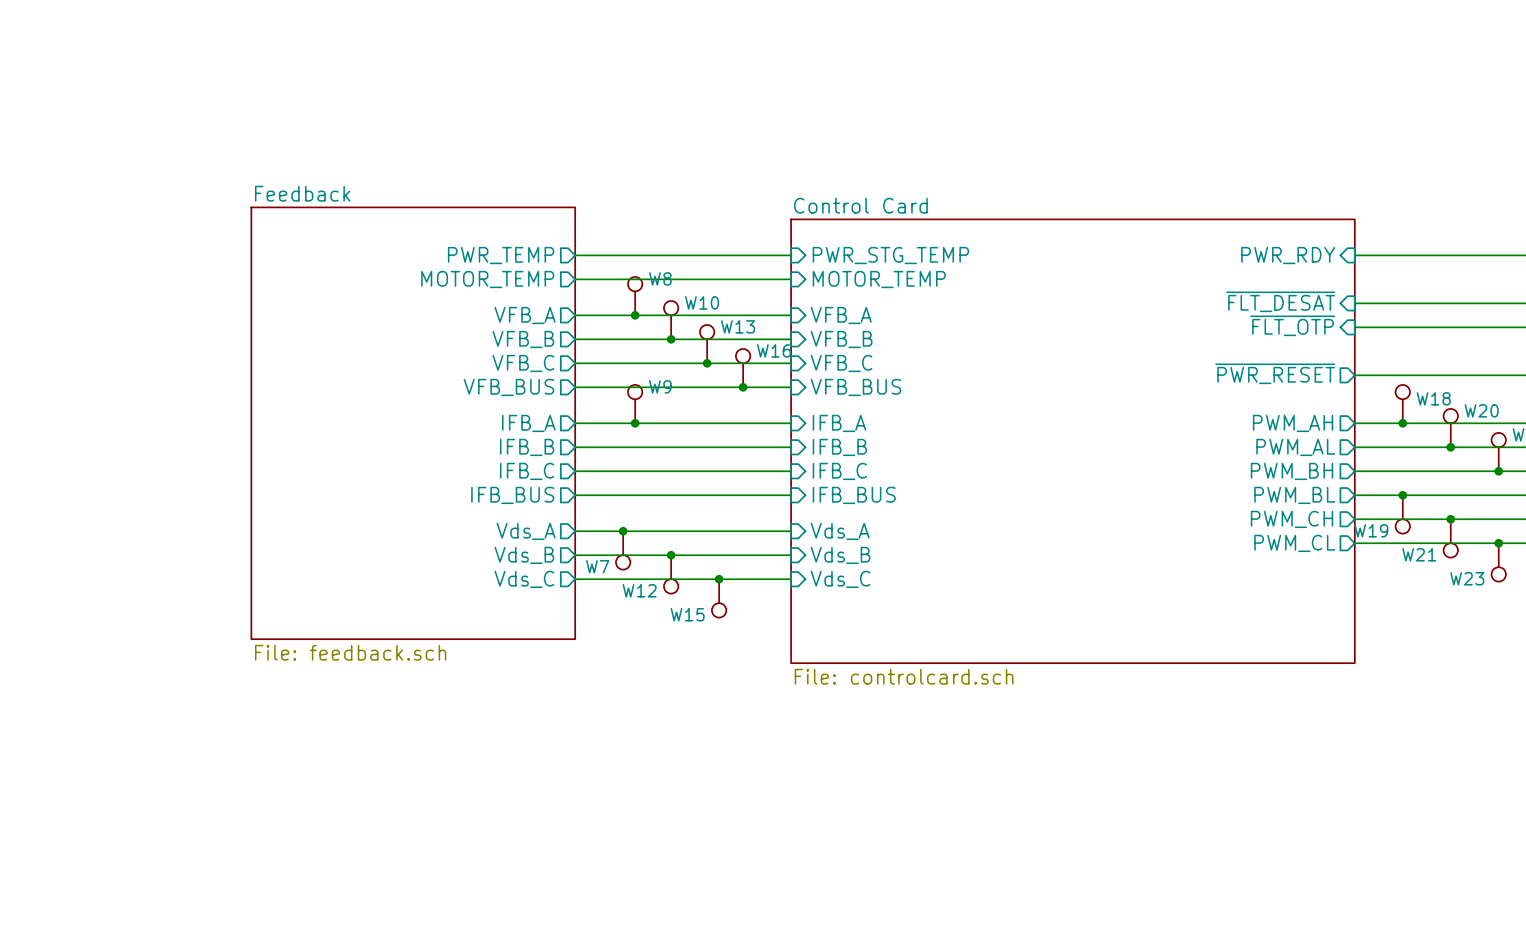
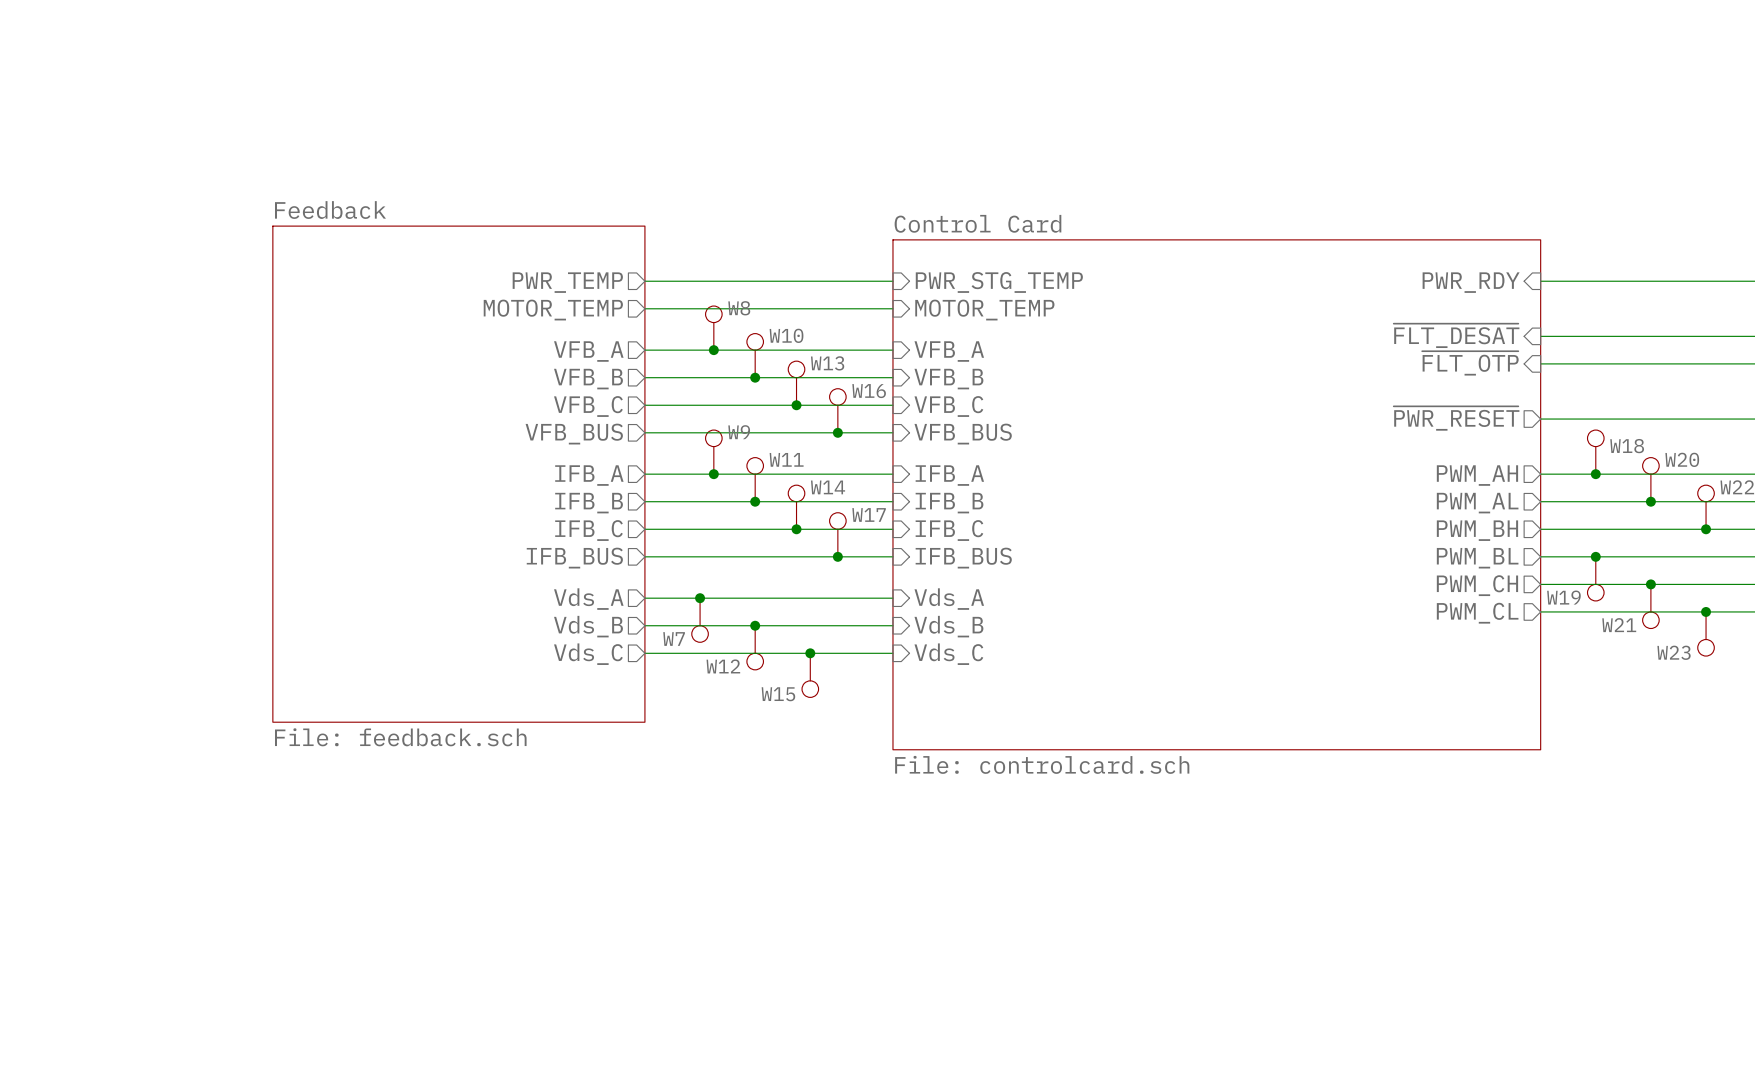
W11: none -> (755, 479)
junction: none -> (755, 501)
W14: none -> (796, 507)
junction: none -> (796, 529)
W17: none -> (837, 534)
junction: none -> (837, 556)

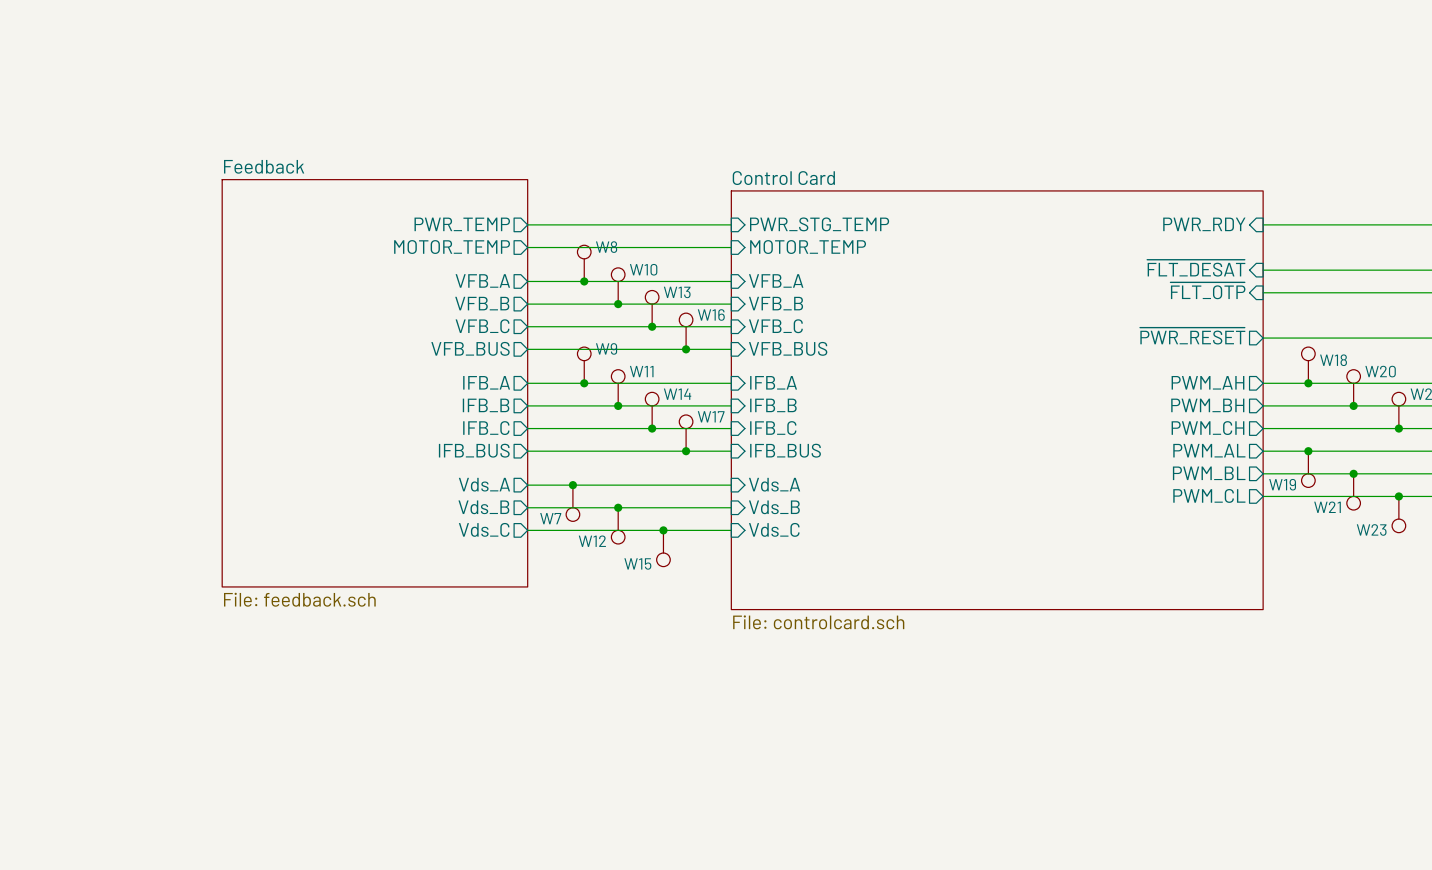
sheet pin: PWM_AL (1477, 503) -> PWM_BH (1207, 405)
sheet pin: PWM_BH (1477, 530) -> PWM_CH (1207, 428)
sheet pin: PWM_BL (1477, 558) -> PWM_AL (1209, 450)
sheet pin: PWM_CH (1477, 585) -> PWM_BL (1209, 473)

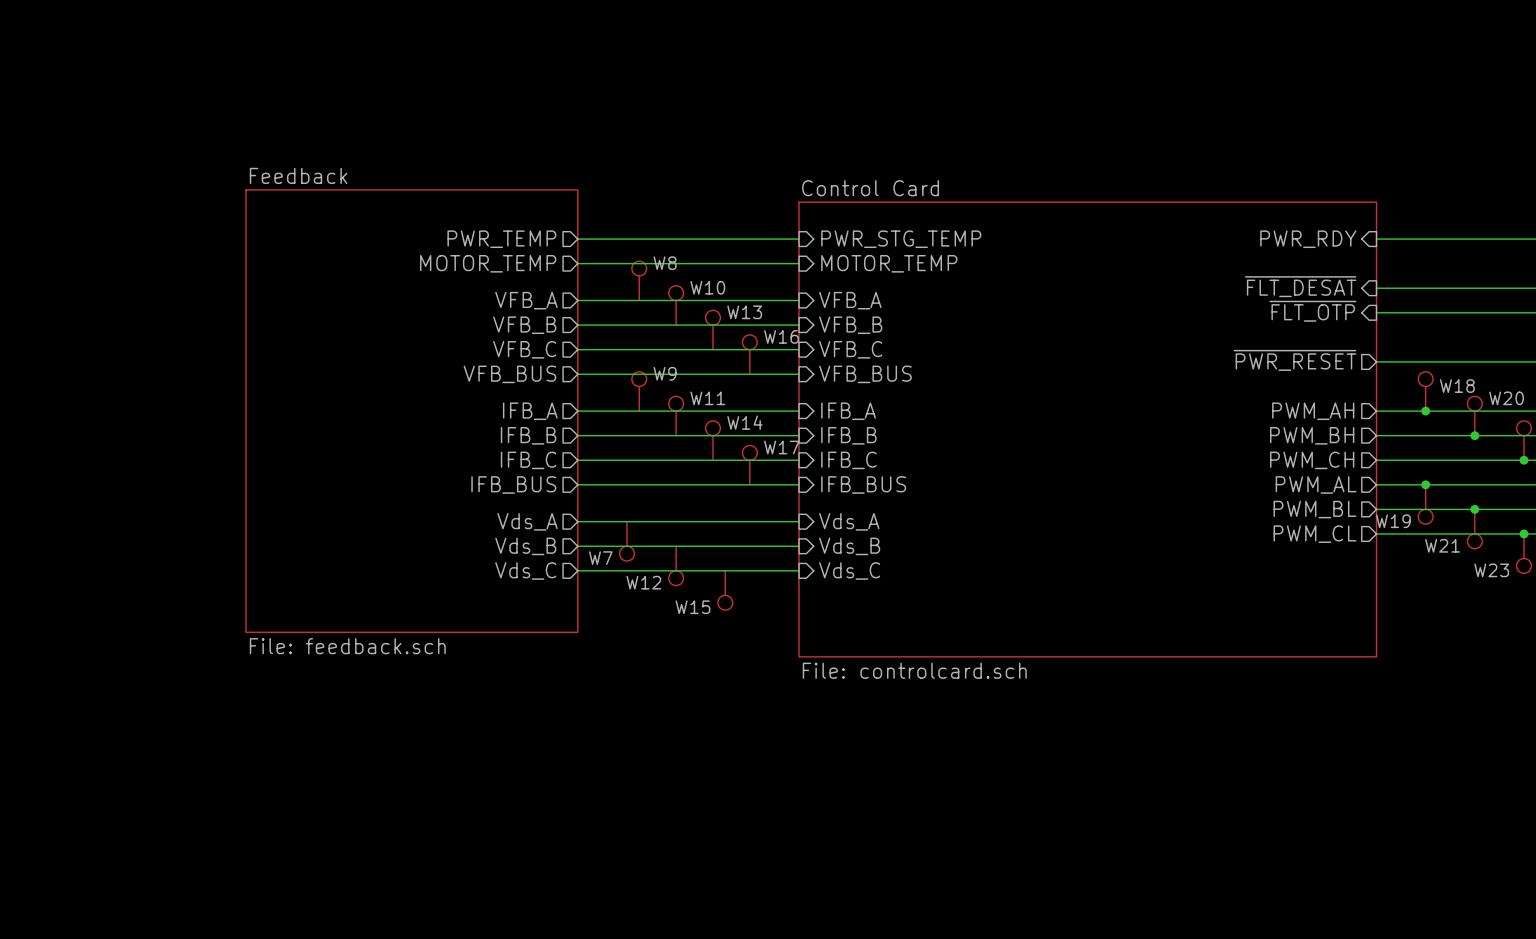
junction: (584, 281) -> none
junction: (618, 304) -> none
junction: (652, 326) -> none
junction: (686, 349) -> none
junction: (584, 383) -> none
junction: (618, 405) -> none
junction: (652, 428) -> none
junction: (686, 451) -> none
junction: (572, 485) -> none
junction: (618, 507) -> none
junction: (663, 530) -> none

